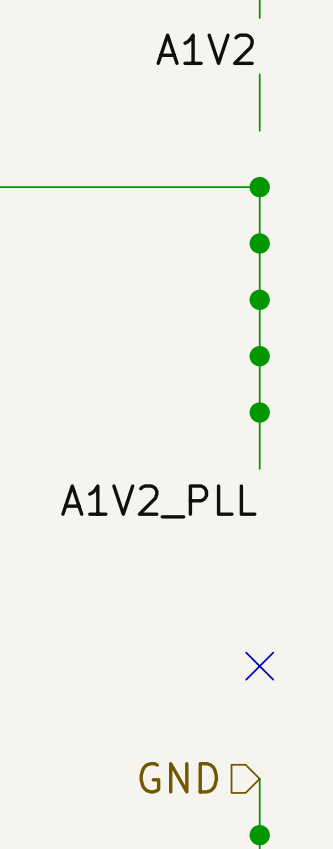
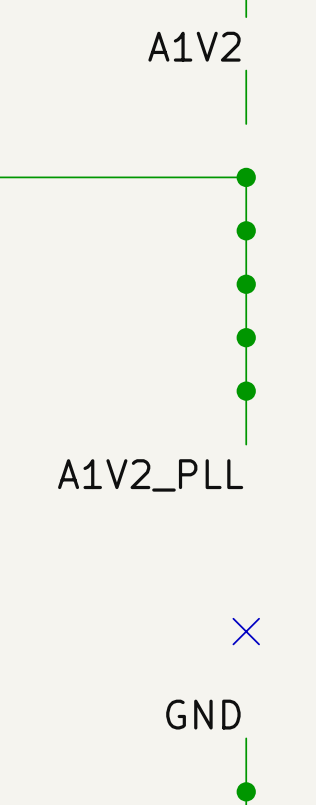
label: none -> GND (203, 714)
hierarchical label: GND (178, 777) -> none

